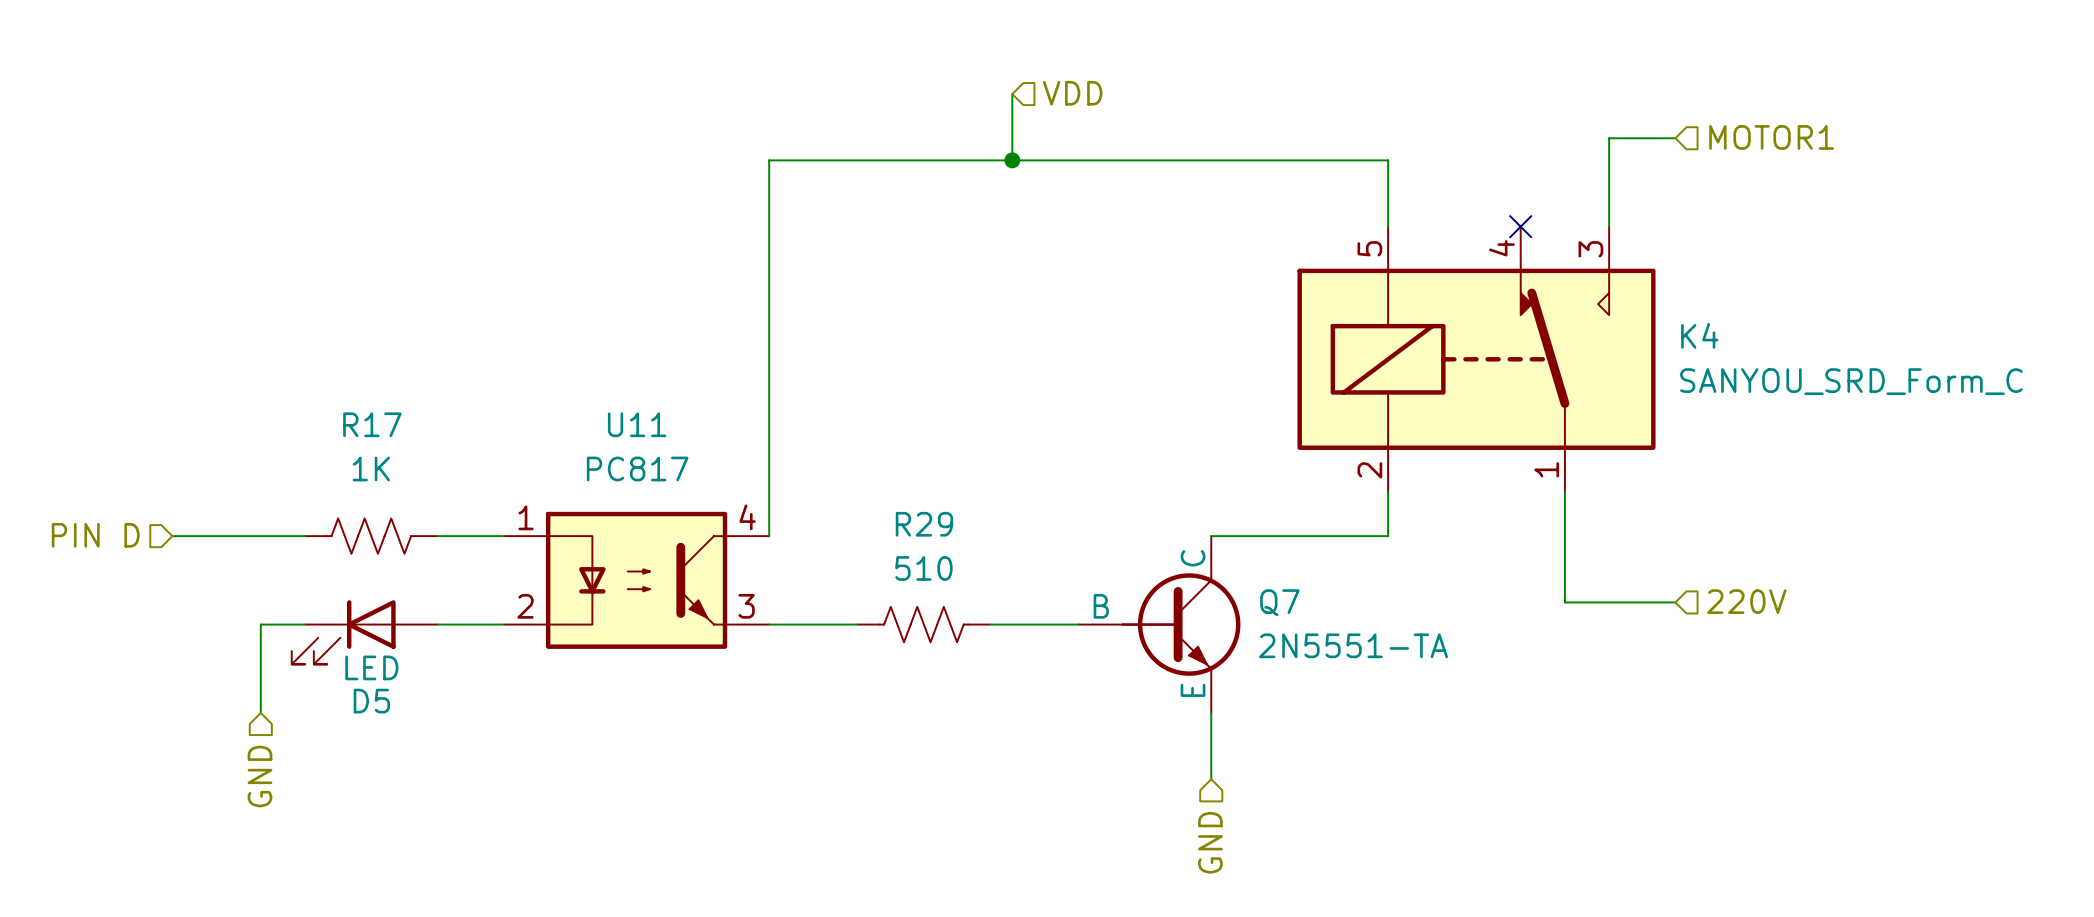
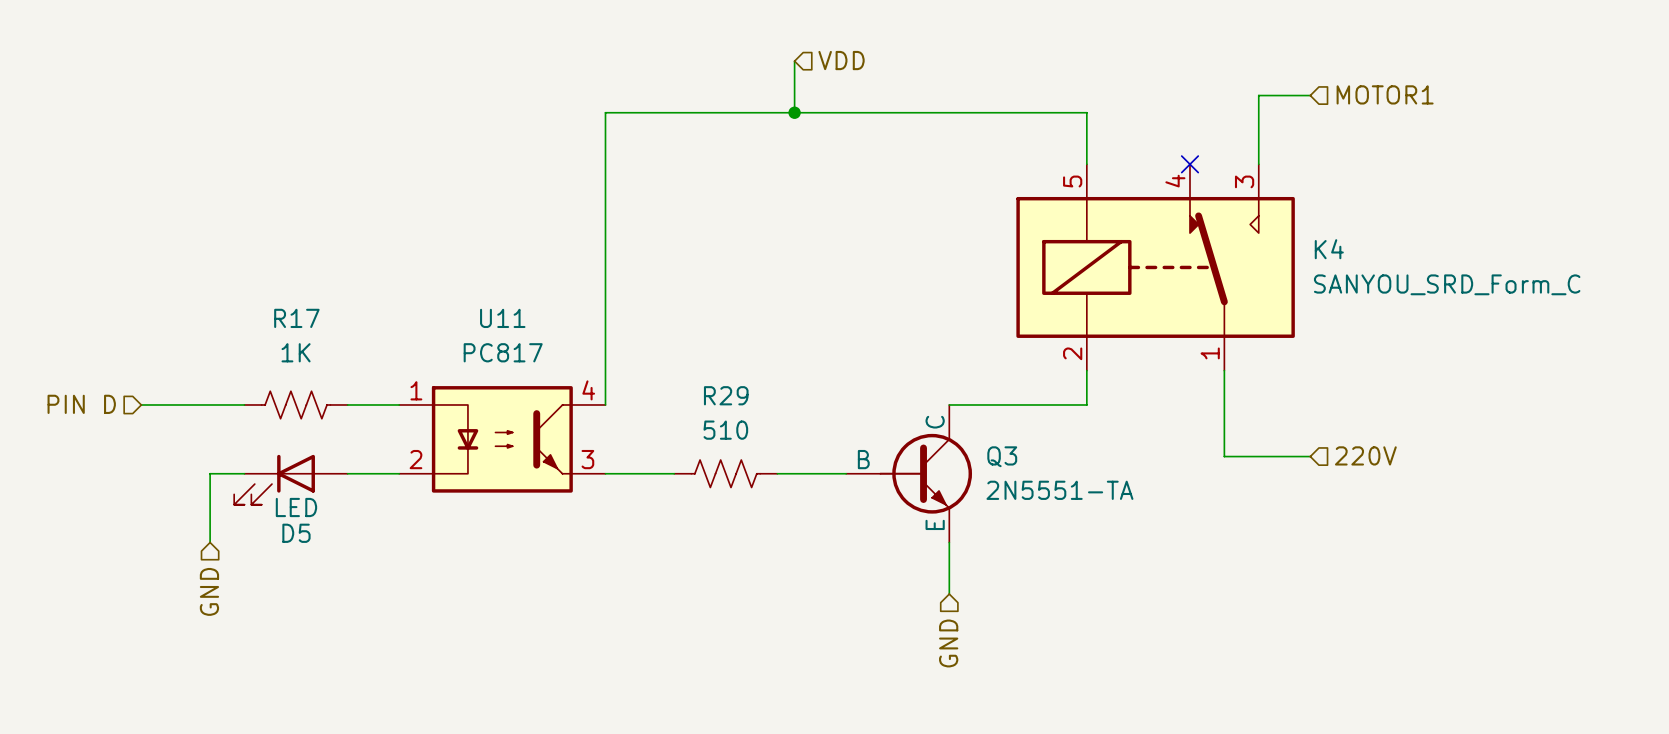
Q7 name: Q7 (1279, 602) -> Q3 (1002, 456)

